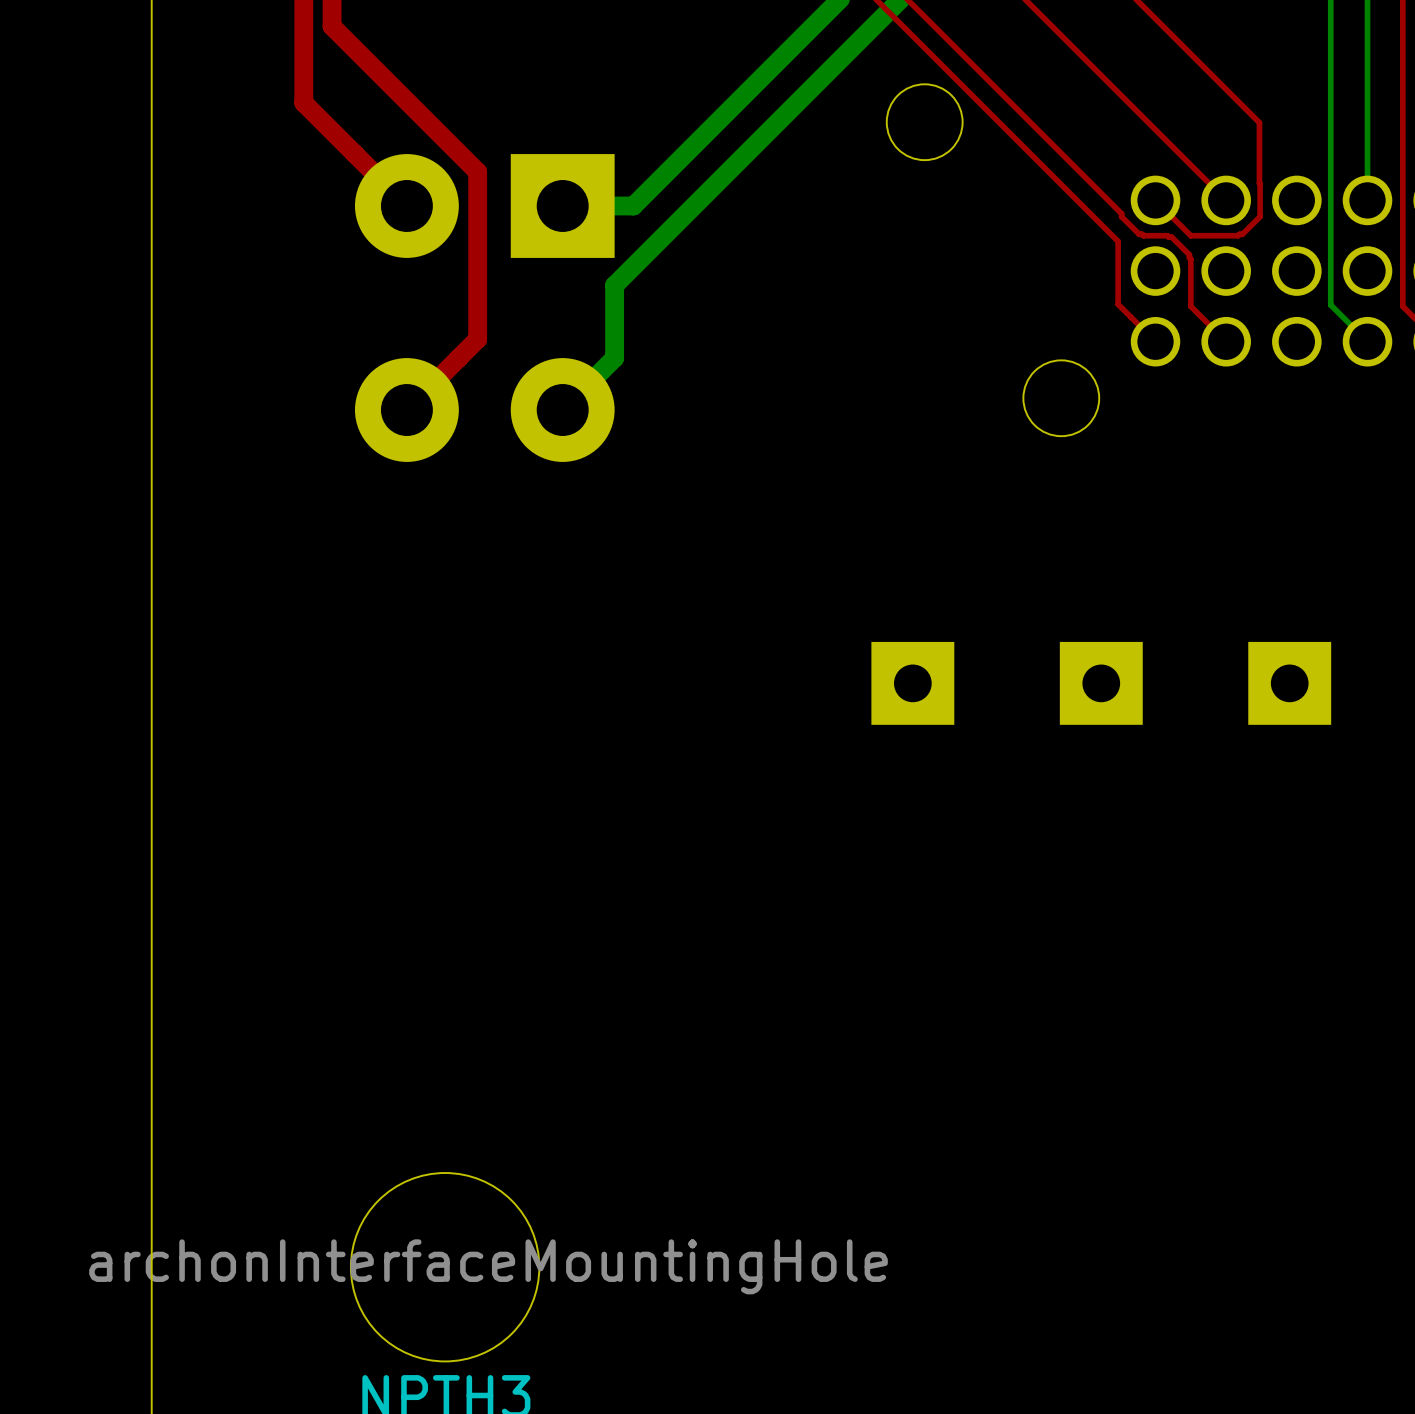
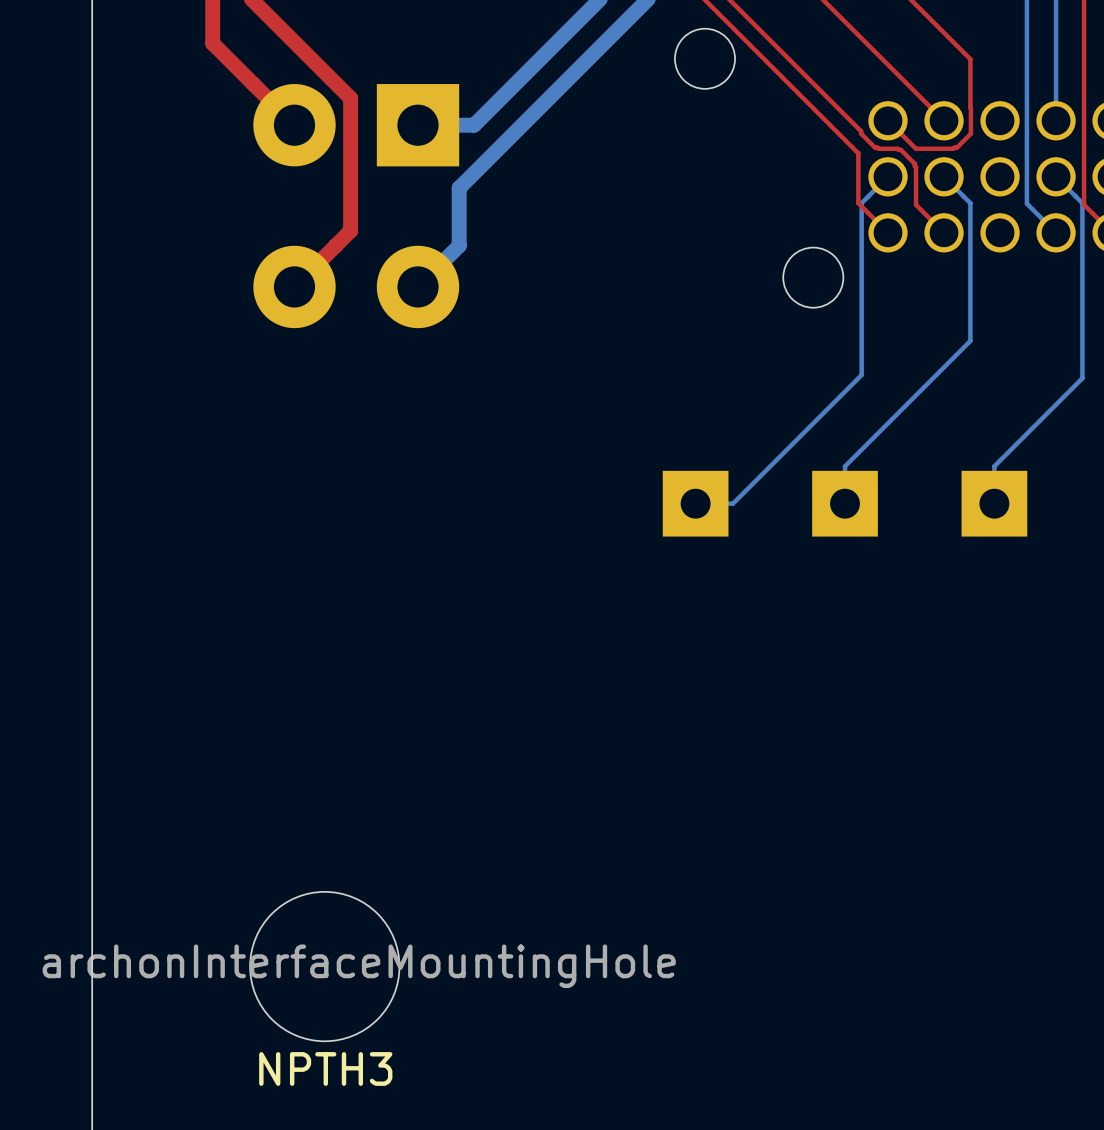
bottom track: none -> (888, 176) (861, 203) (861, 374) (732, 503) (695, 503)
bottom track: none -> (944, 176) (970, 203) (970, 340) (845, 466) (845, 503)
bottom track: none -> (1056, 176) (1082, 203) (1082, 378) (994, 466) (994, 503)

